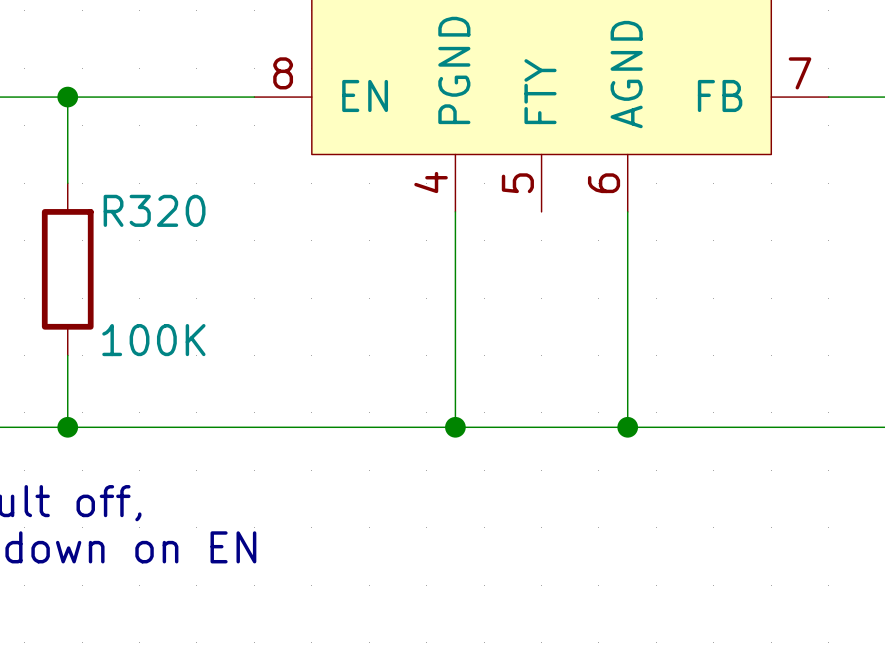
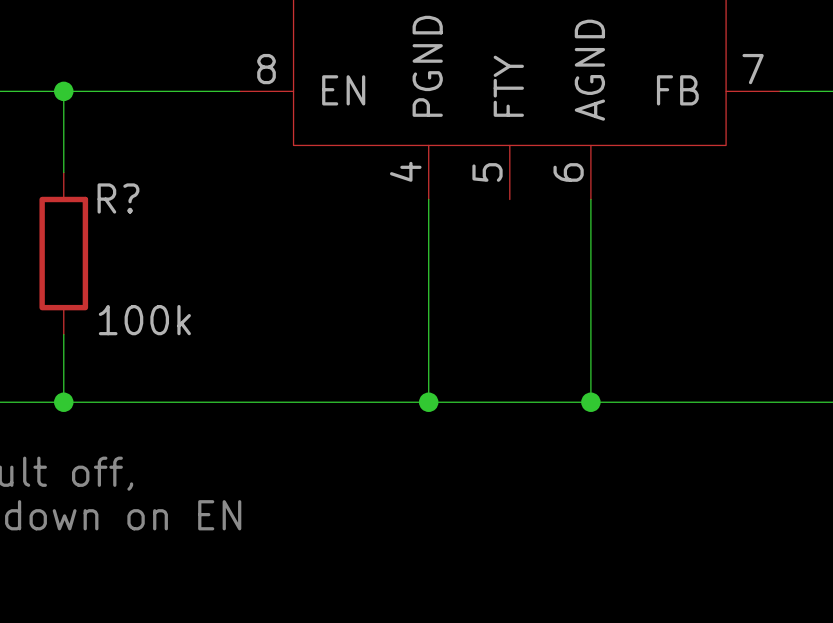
R320 name: R320 (154, 210) -> R? (118, 198)
R320 value: 100K (153, 340) -> 100k (144, 320)

